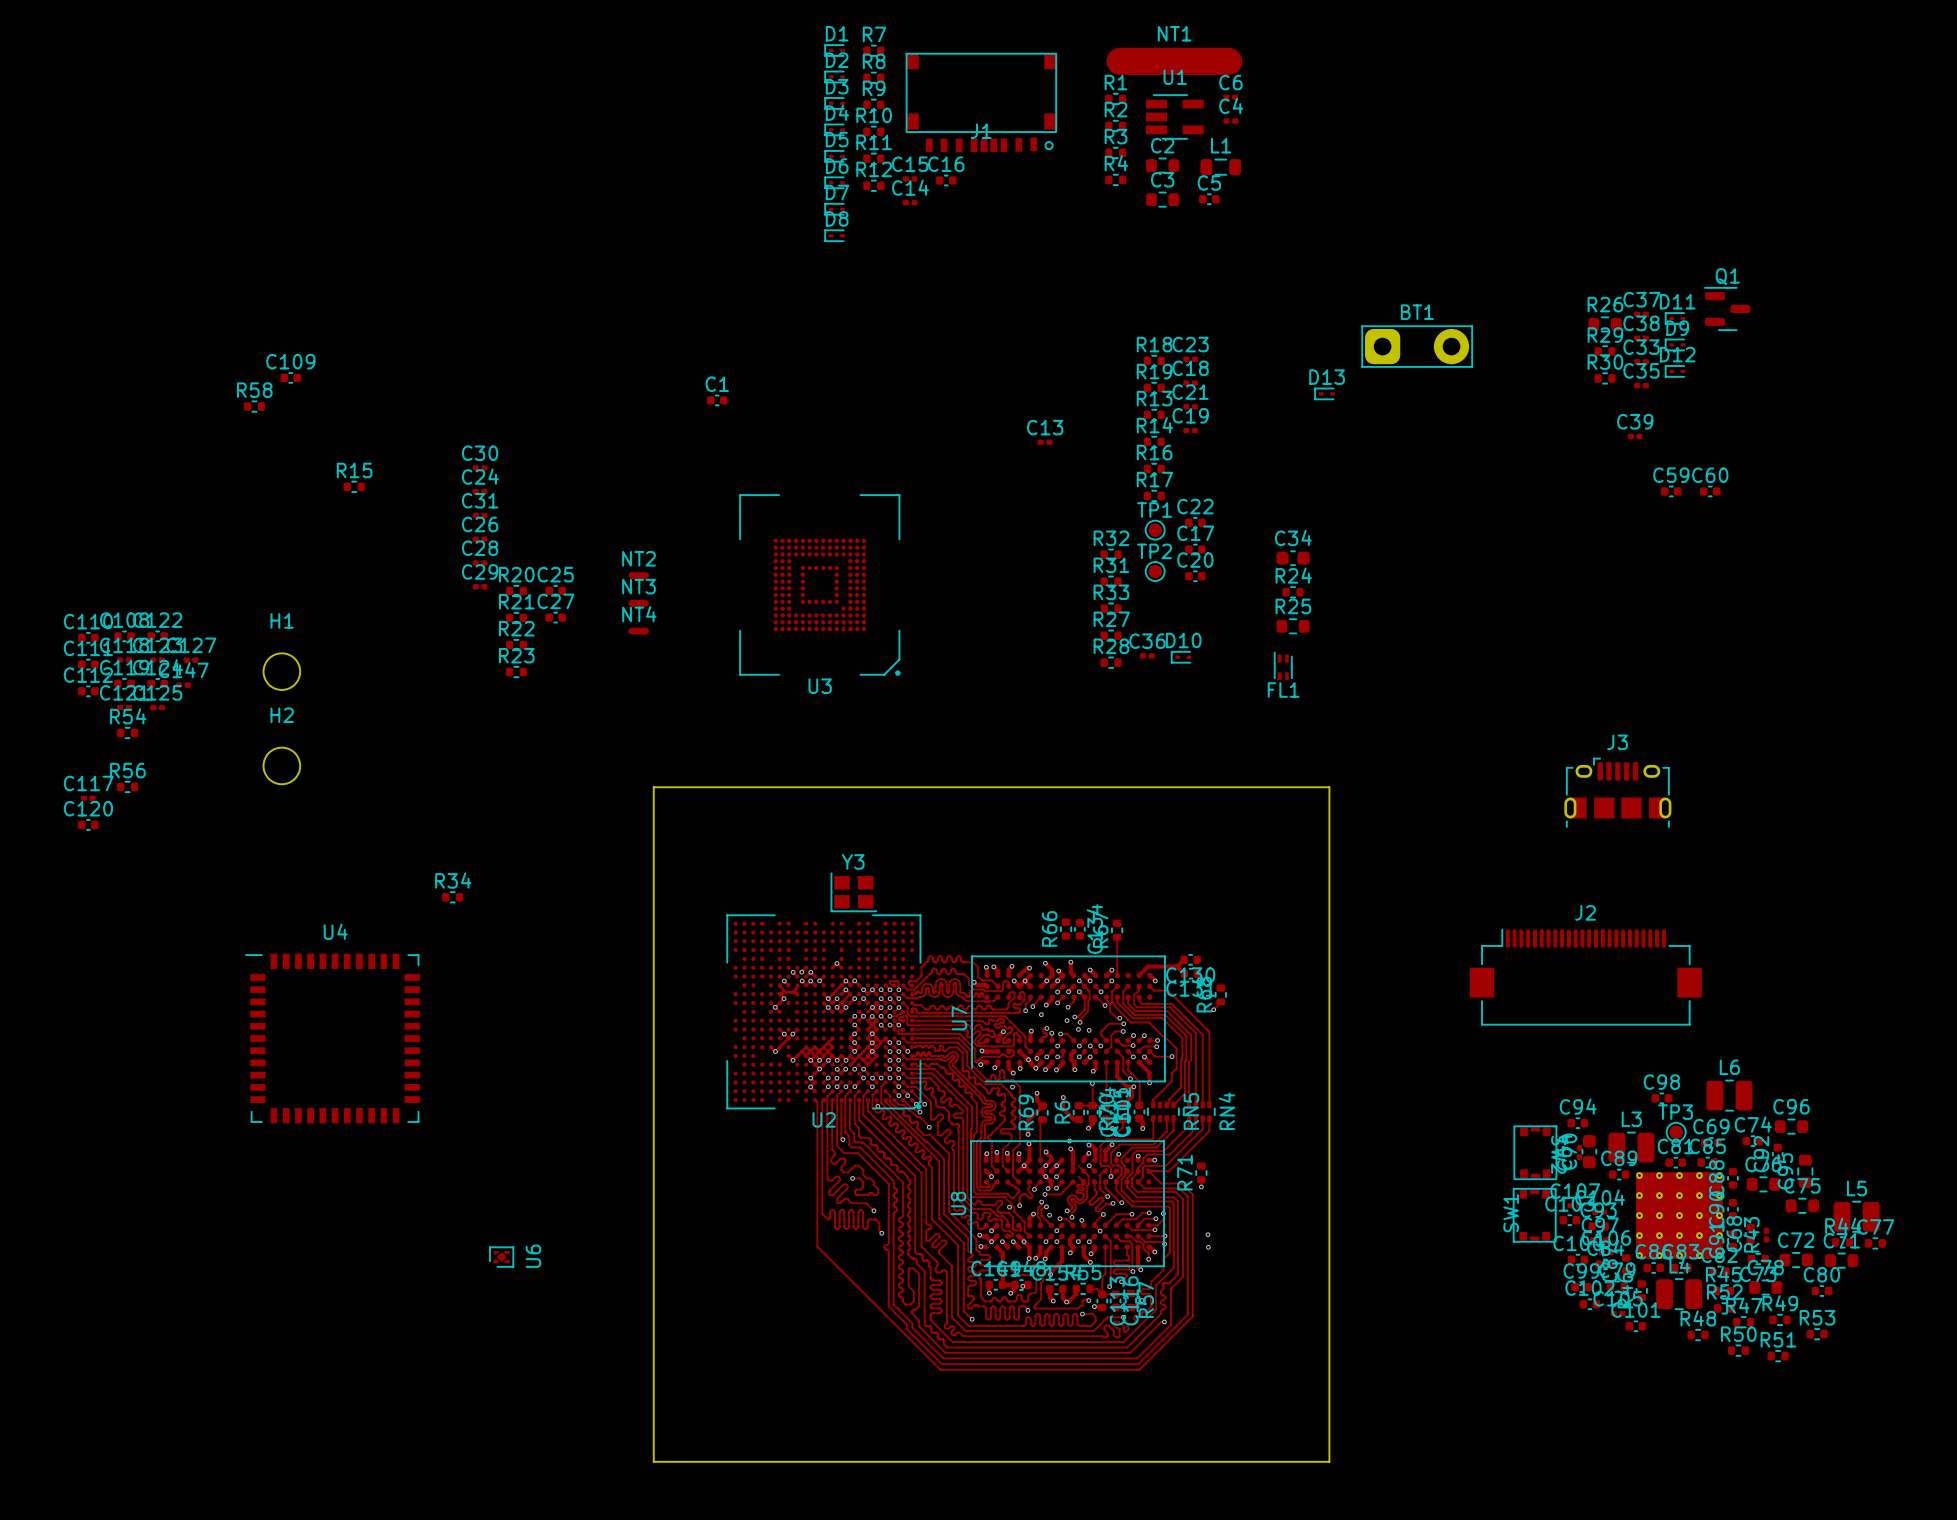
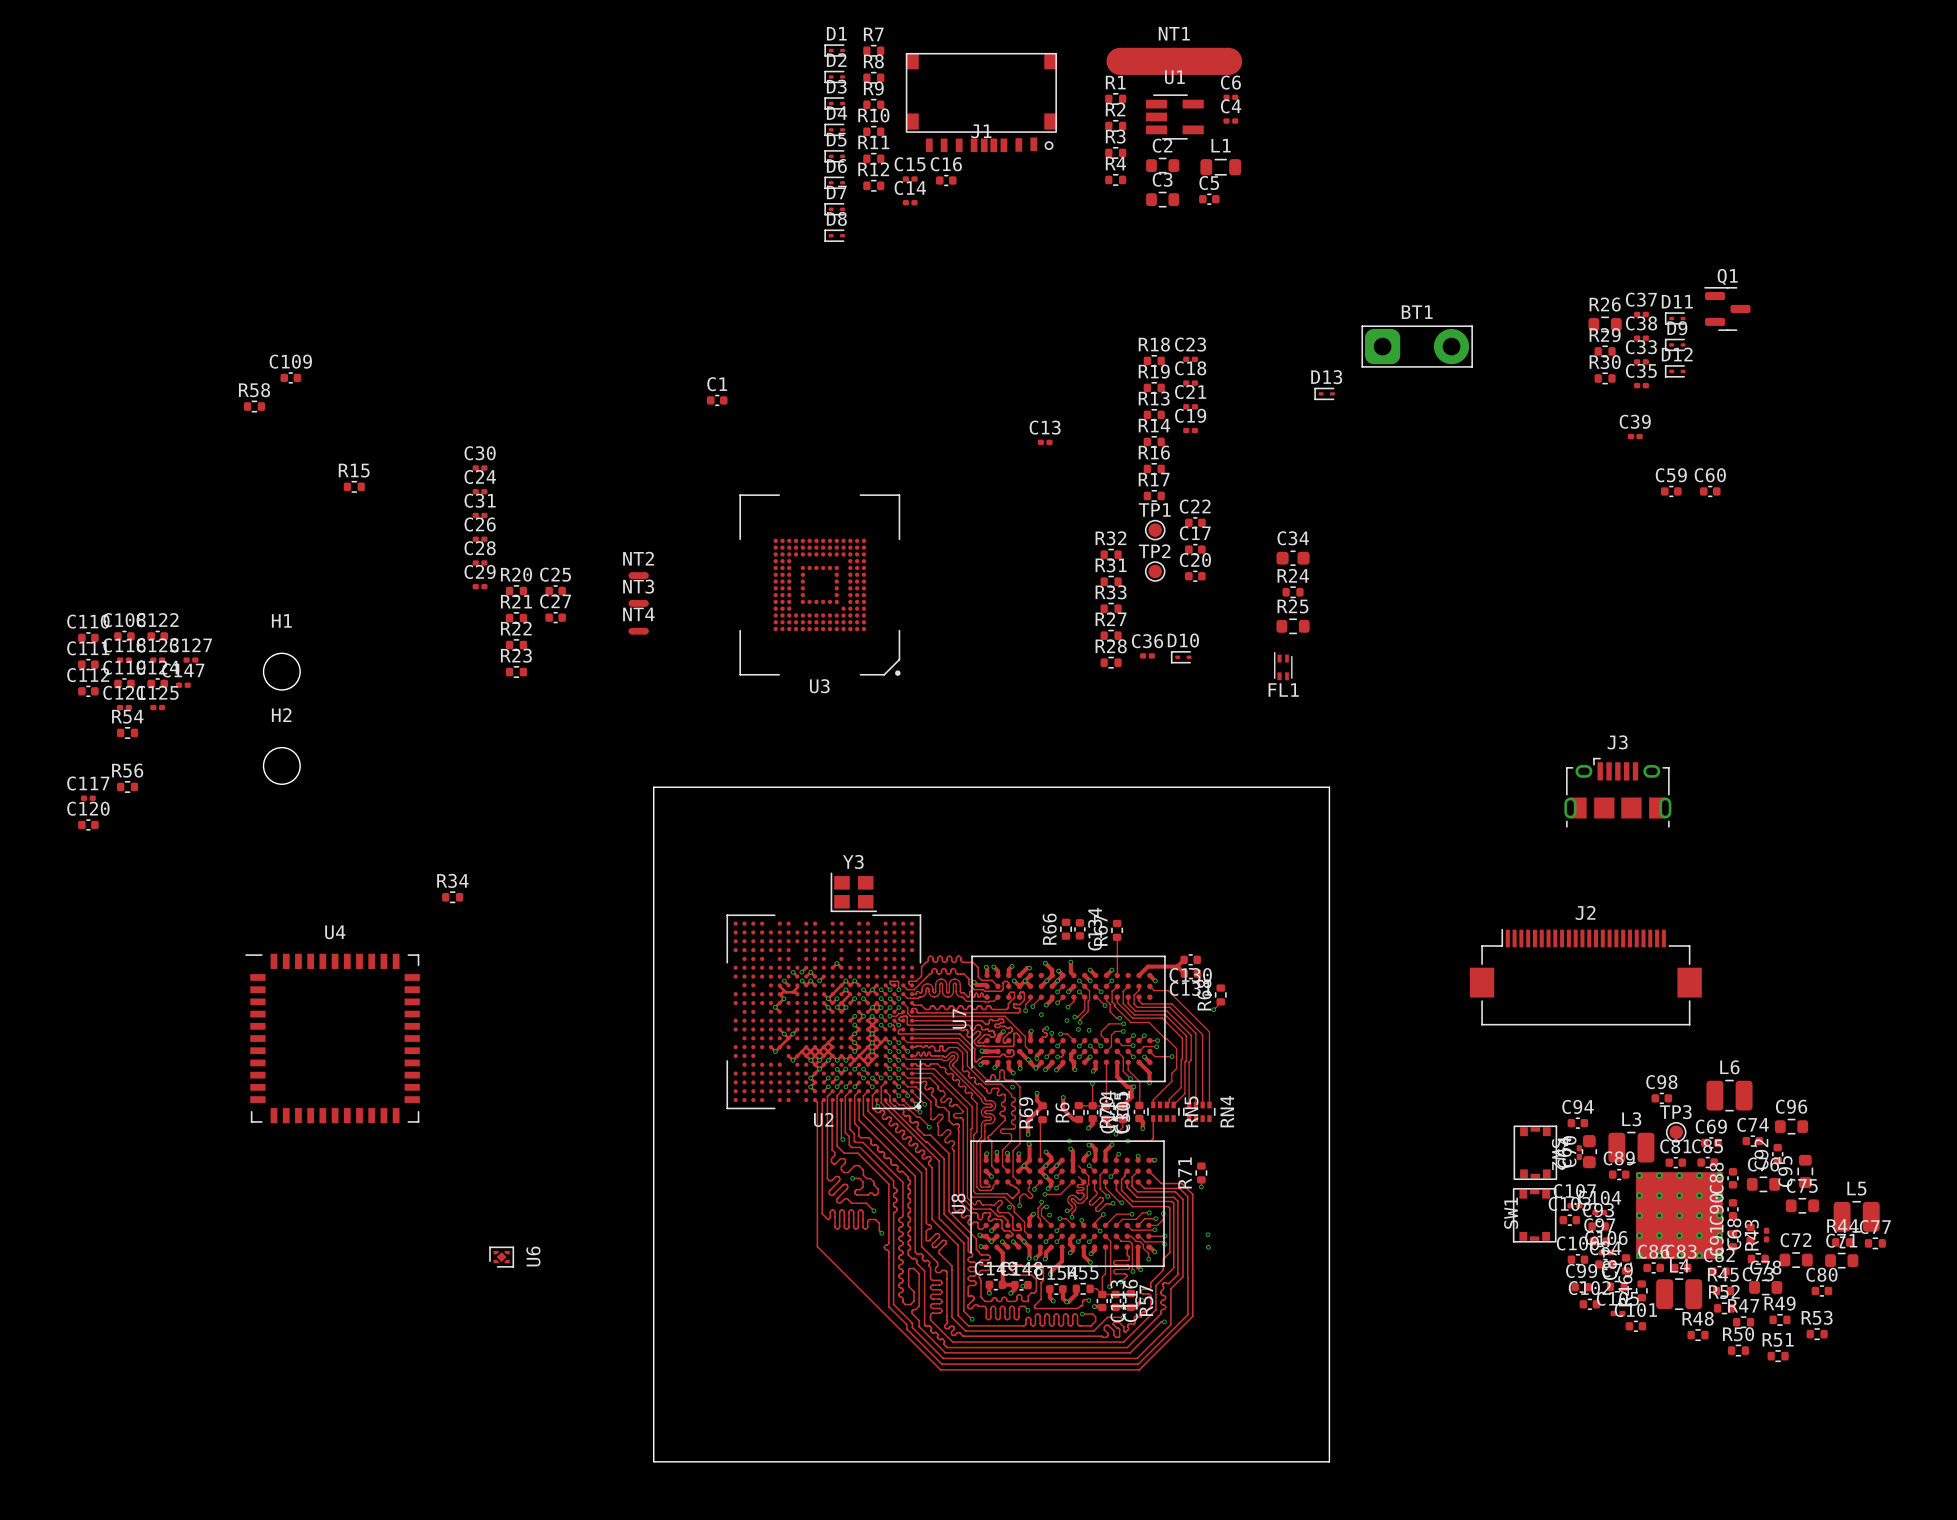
track: (1166, 1118) (1166, 1131) (1153, 1144) (1119, 1144) (1111, 1153) (1111, 1163) (1121, 1168) (1121, 1174) (1116, 1181) -> none
track: (1173, 1118) (1173, 1130) (1156, 1147) (1132, 1147) (1121, 1158) (1121, 1162) (1127, 1171) -> none
track: (1189, 1118) (1189, 1125) (1163, 1150) (1136, 1150) (1132, 1155) (1132, 1172) (1127, 1178) (1127, 1181) -> none
track: (1195, 1118) (1195, 1128) (1169, 1154) (1147, 1154) (1138, 1167) (1138, 1172) (1132, 1178) -> (1138, 1171) (1132, 1178)
track: (1202, 1118) (1202, 1129) (1165, 1165) (1144, 1165) (1142, 1167) (1142, 1177) (1138, 1181) -> none
track: (1209, 1118) (1209, 1130) (1169, 1171) (1148, 1171) -> none
track: (1152, 1139) (1106, 1139) (1100, 1145) (1100, 1164) (1110, 1168) (1110, 1176) -> (1152, 1139) (1150, 1141) (1127, 1141)
via: none -> (1127, 1141)

